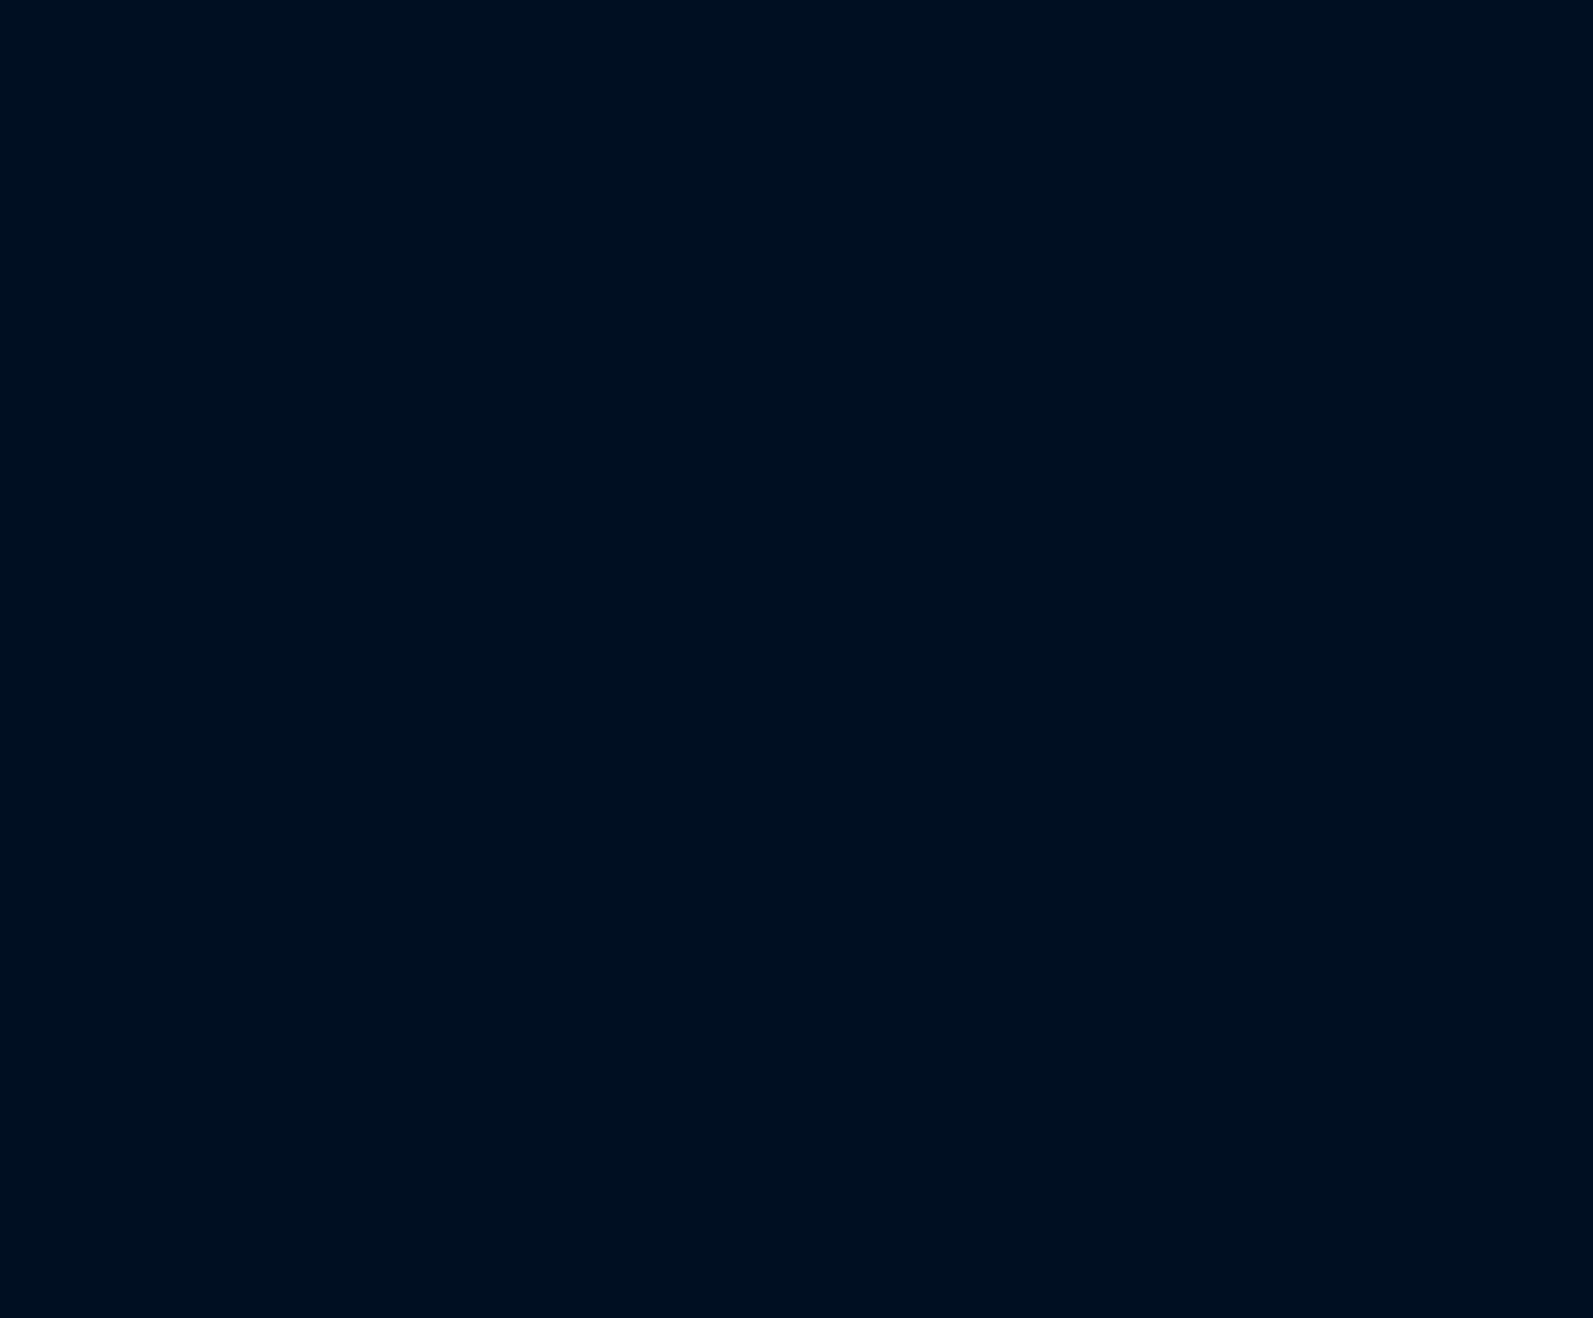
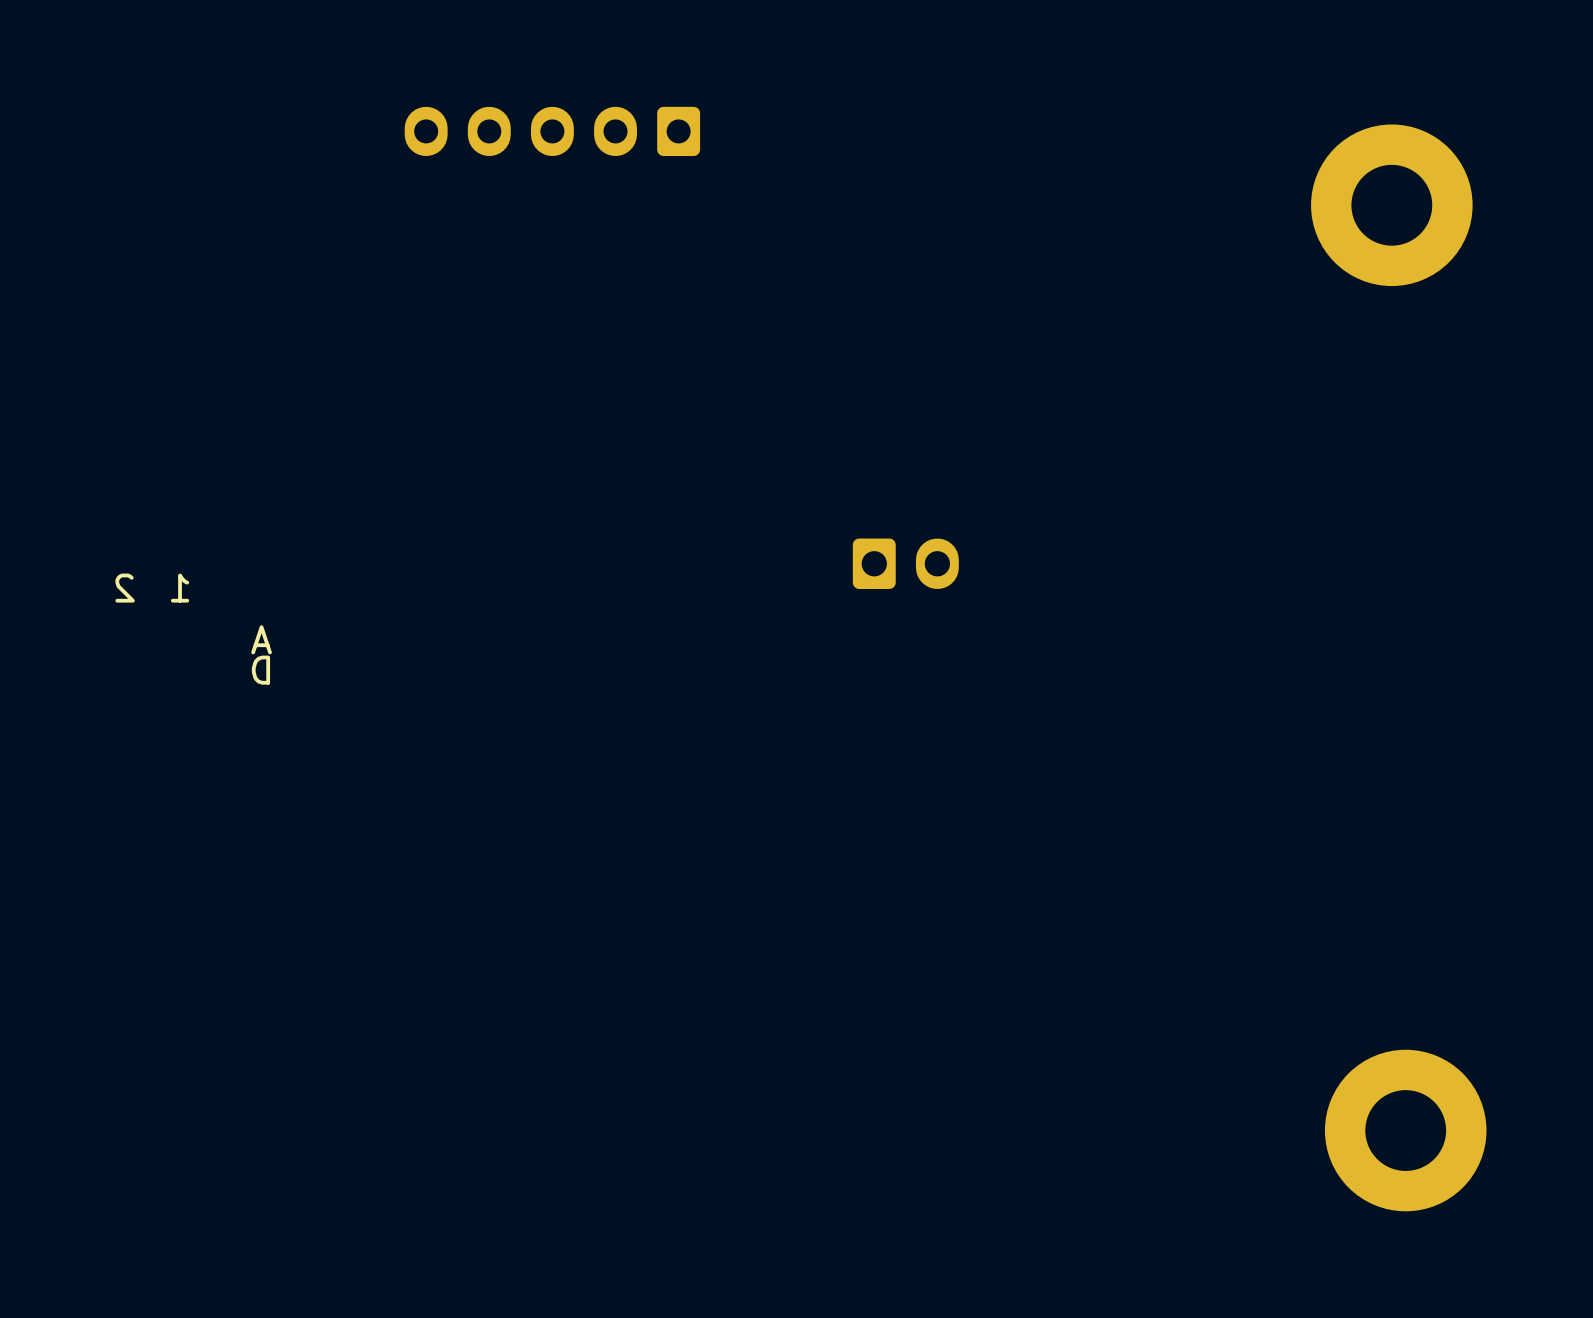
part: none -> (552, 131)
part: none -> (1391, 205)
part: none -> (905, 563)
part: none -> (193, 629)
part: none -> (1405, 1130)

